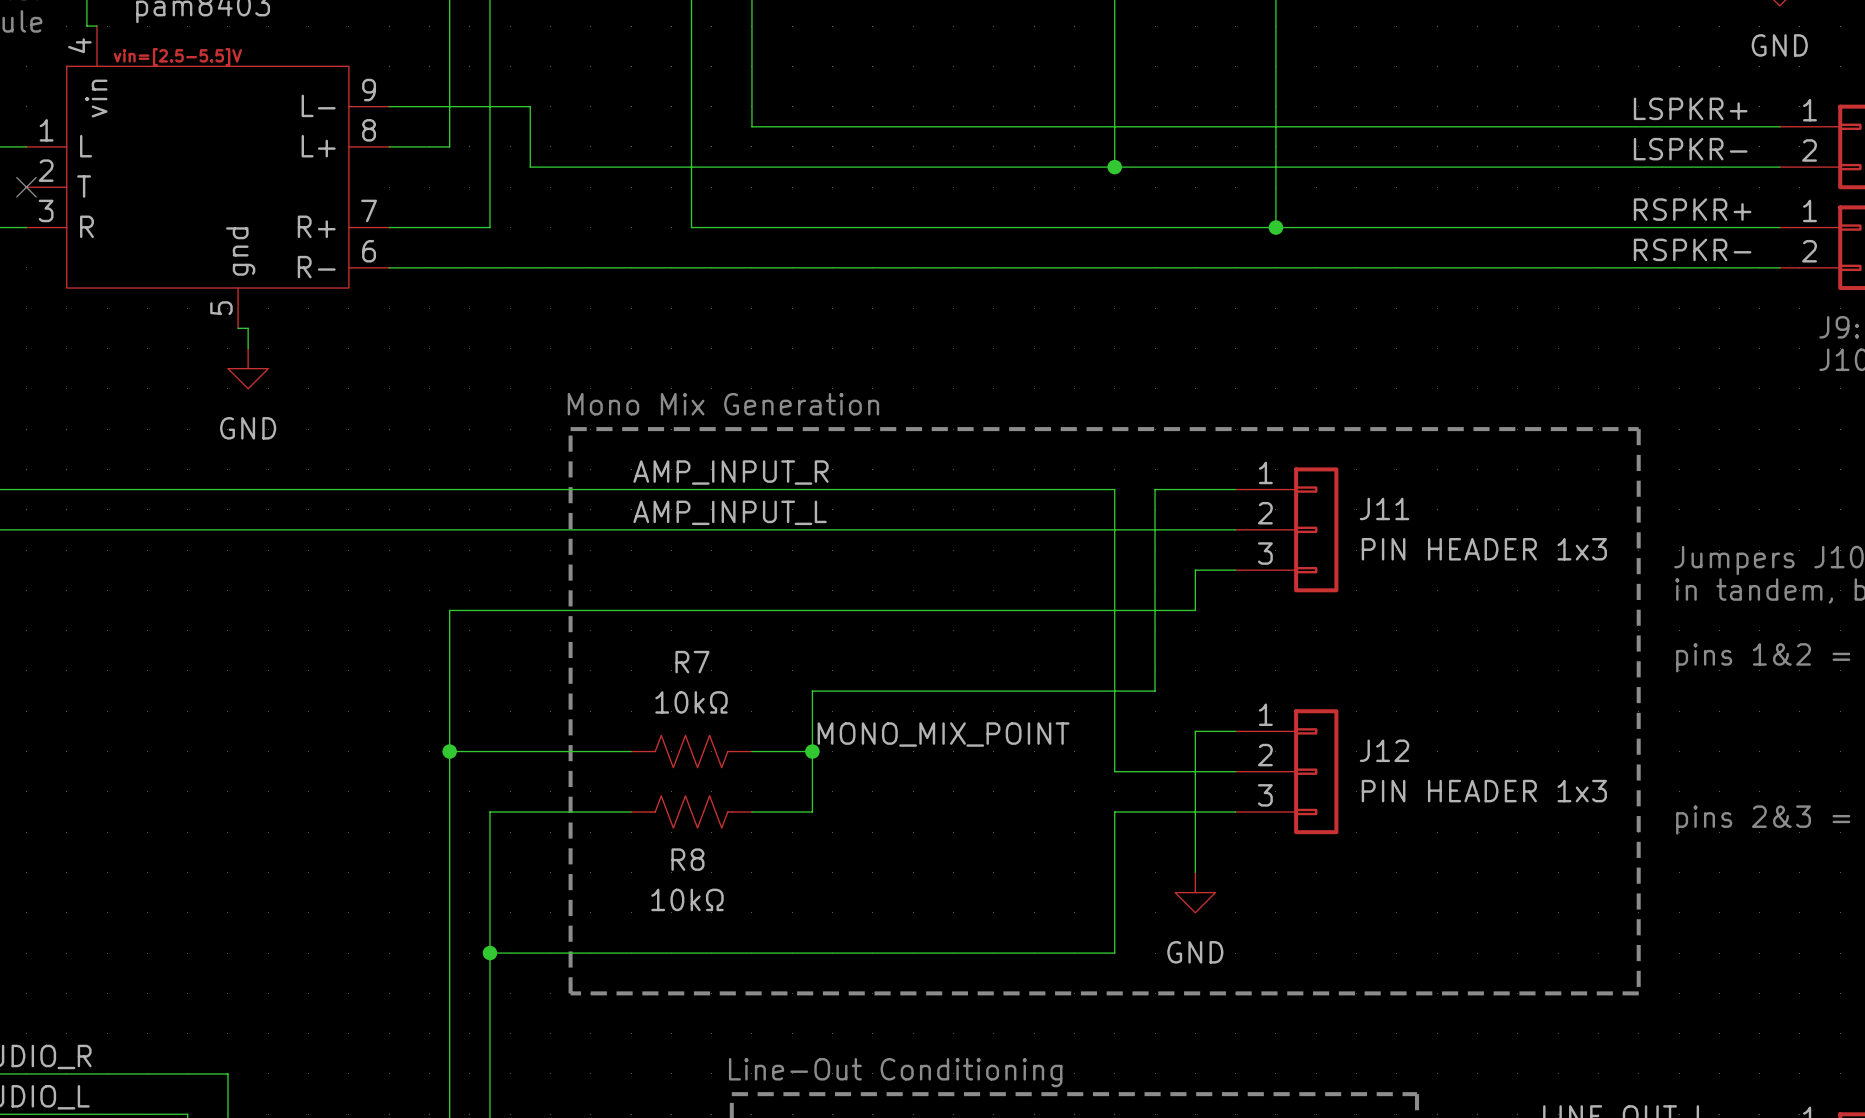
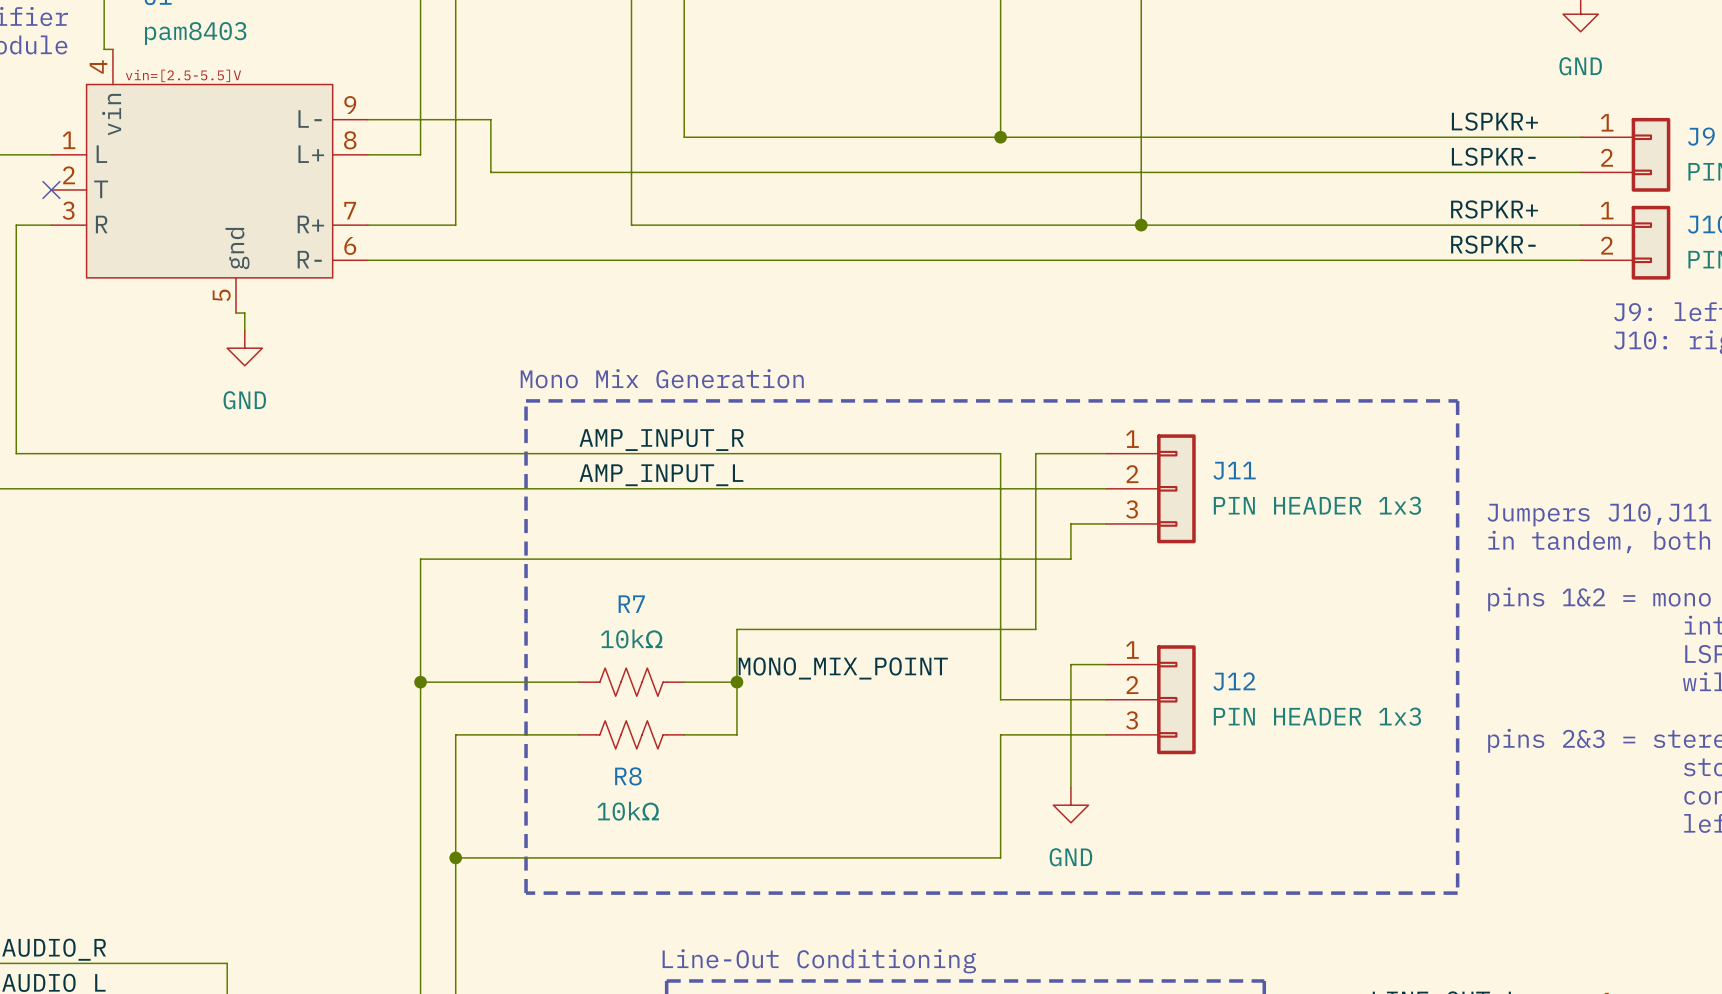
wire: (1114, 126) (1114, 167) -> none
junction position: (1114, 167) -> (1000, 137)

